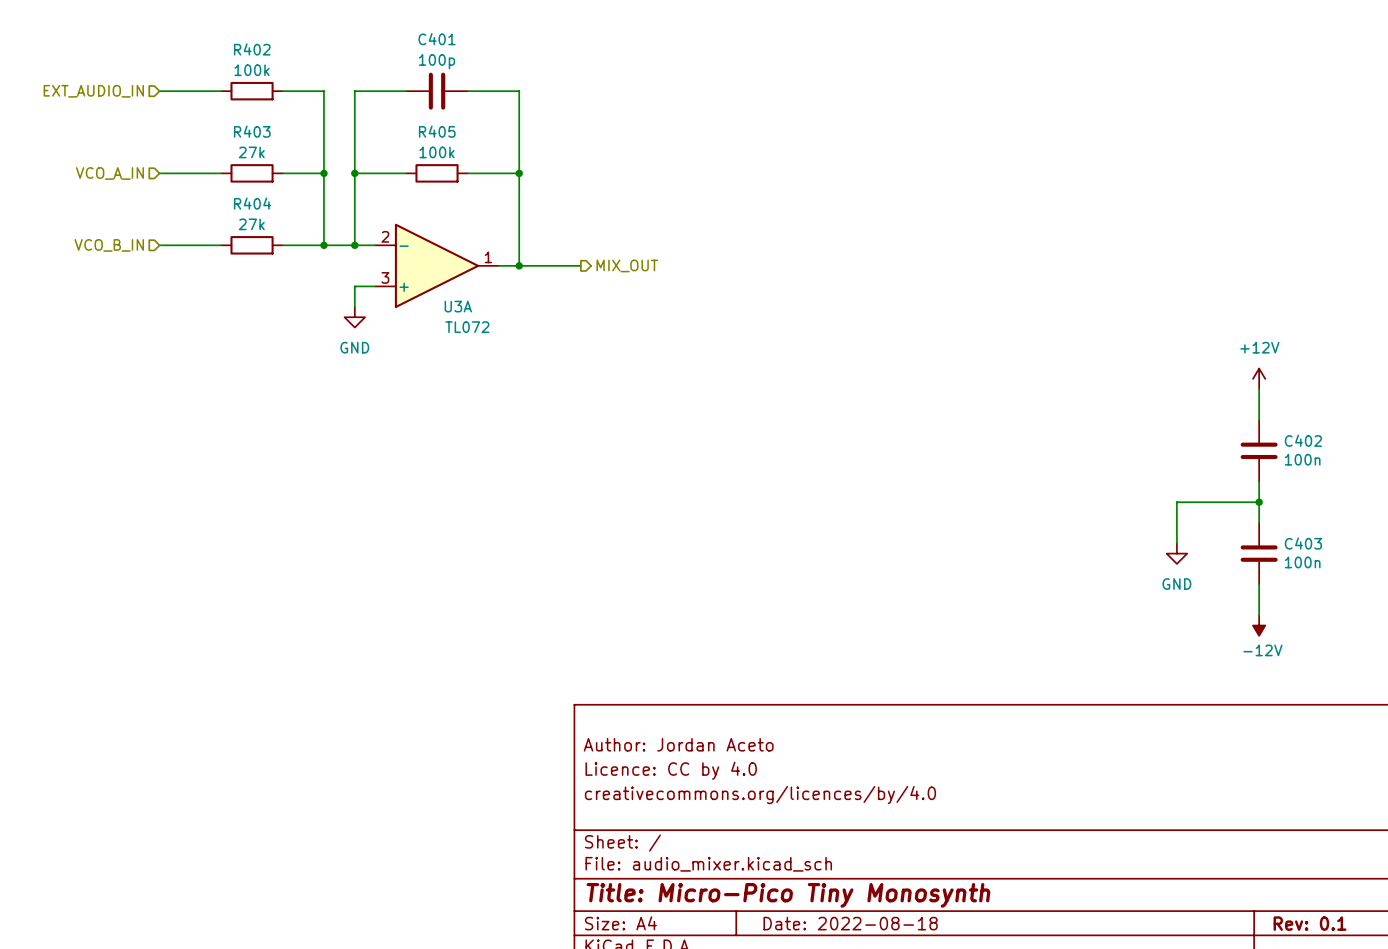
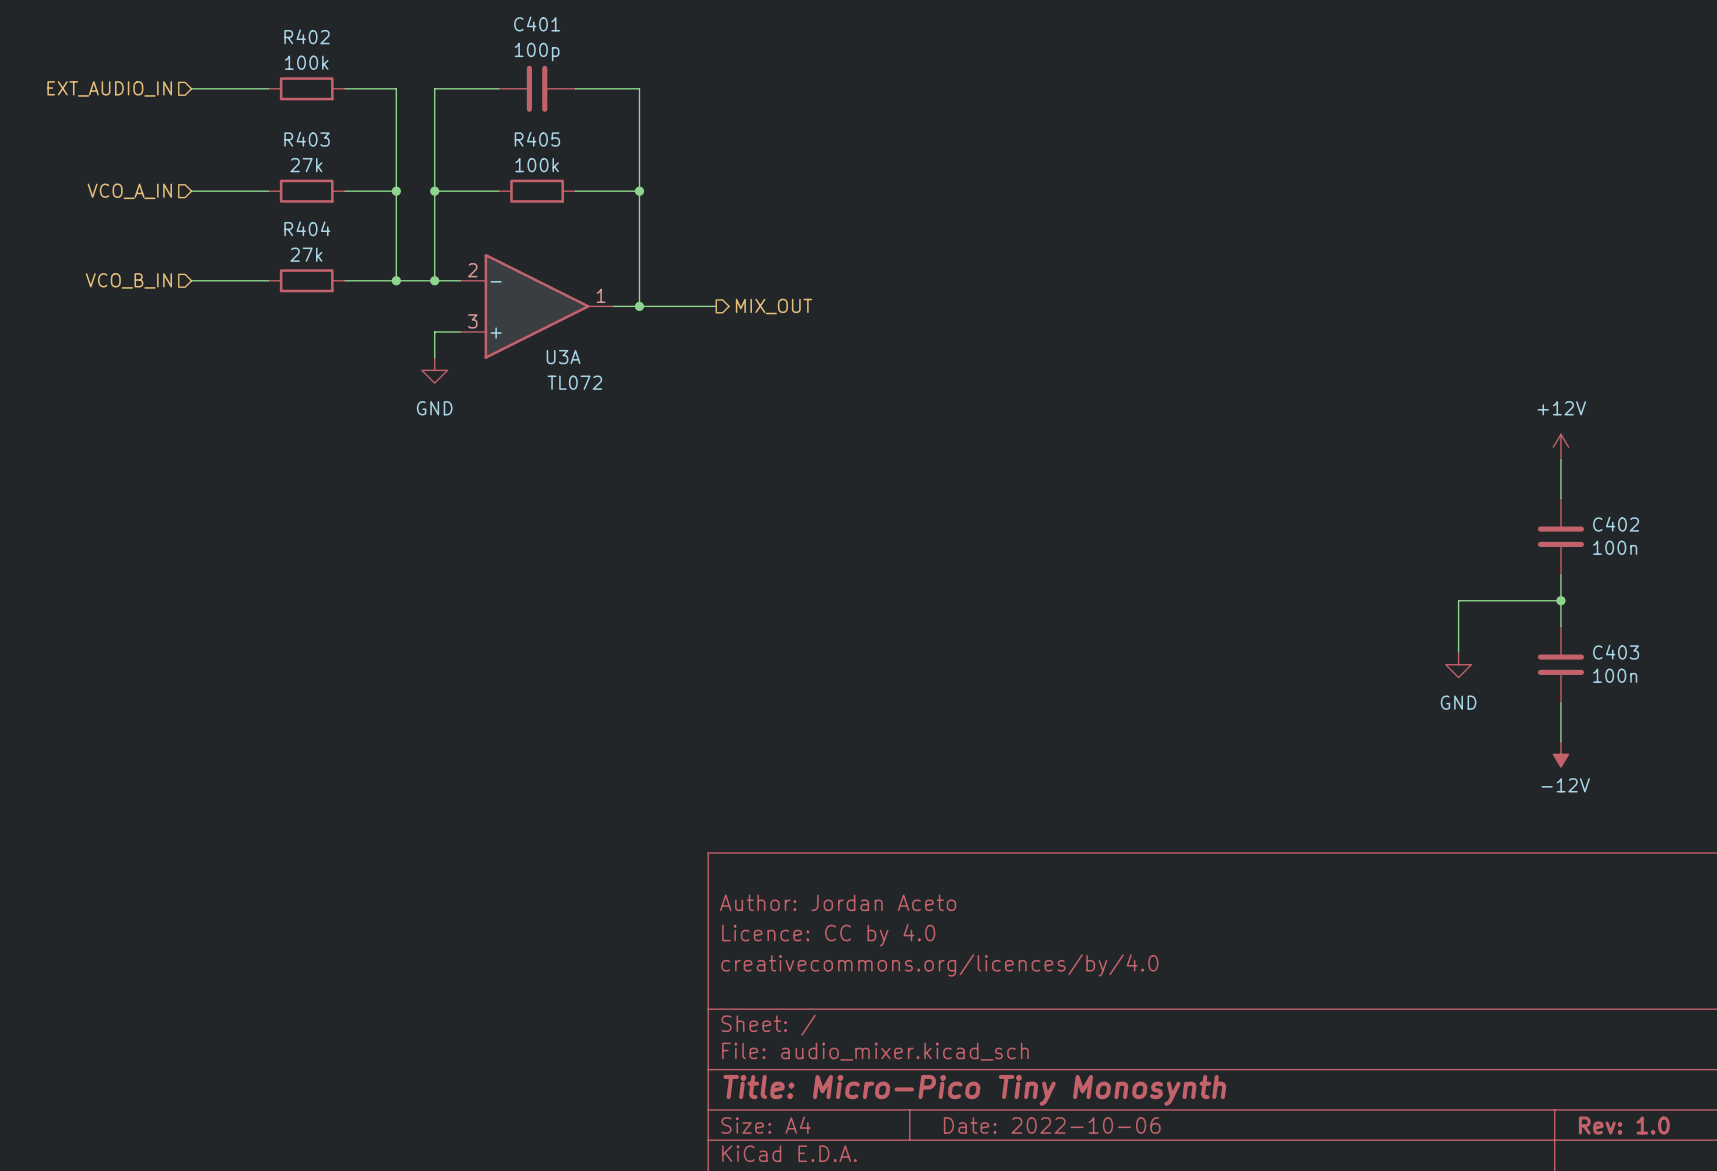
title block: Date: 2022-08-18 (850, 923) -> Date: 2022-10-06 (1052, 1125)
title block: Rev: 0.1 (1310, 923) -> Rev: 1.0 (1624, 1125)

